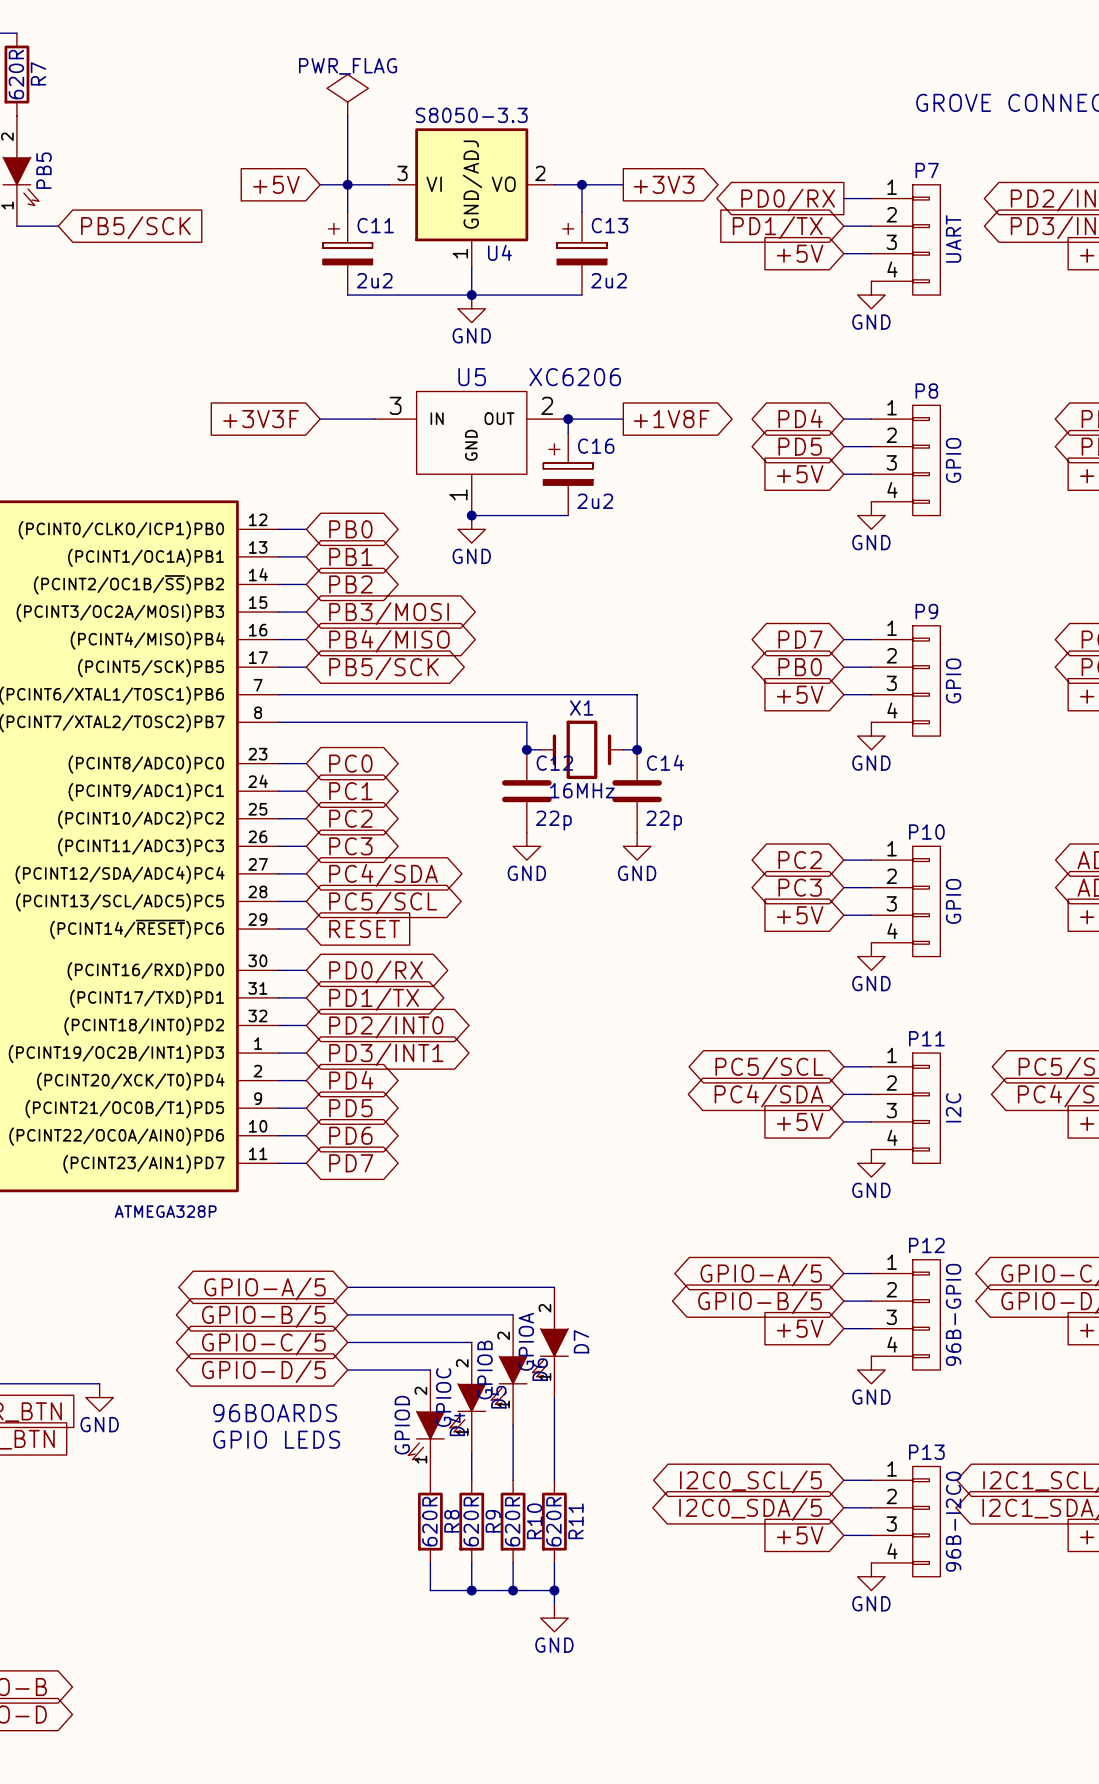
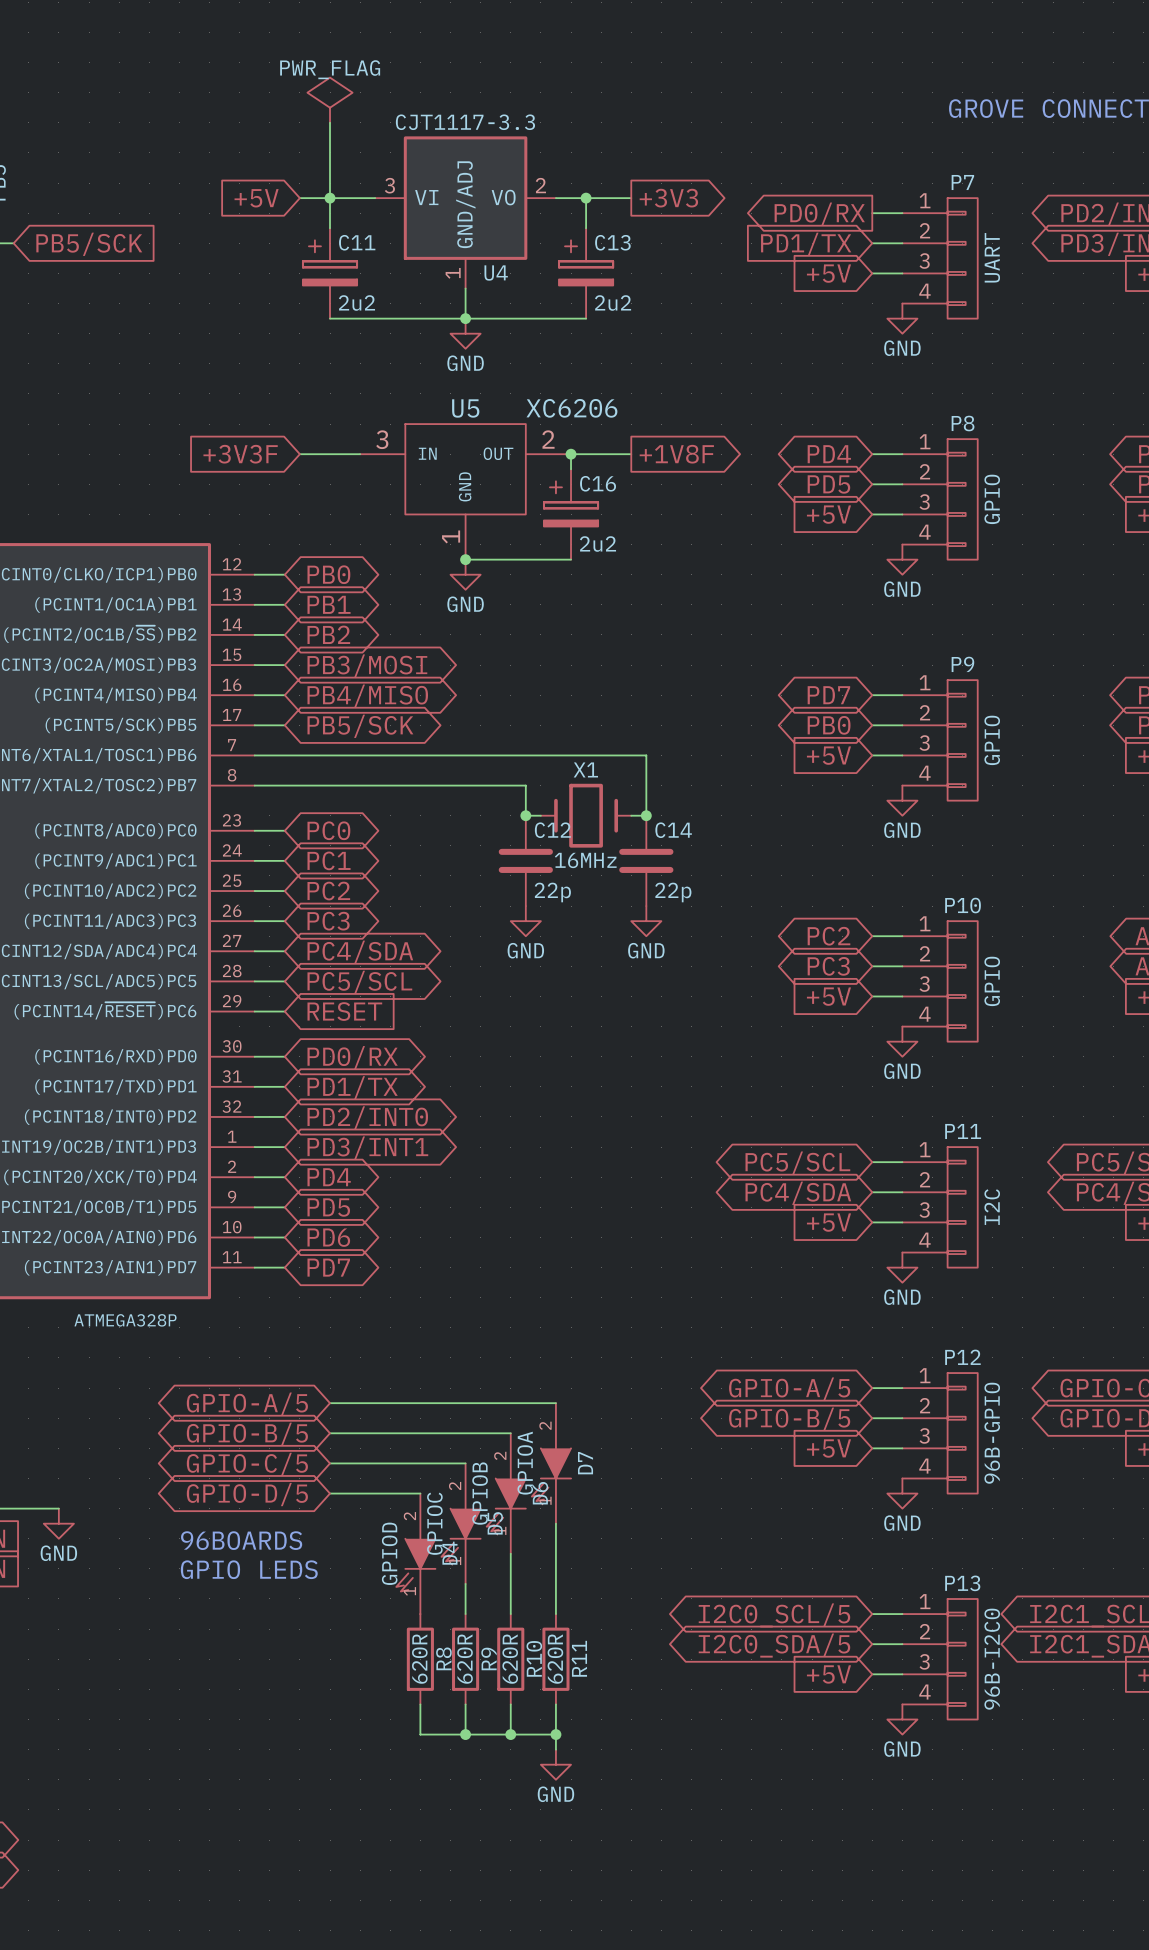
U4 value: S8050-3.3 (471, 115) -> CJT1117-3.3 (465, 122)

